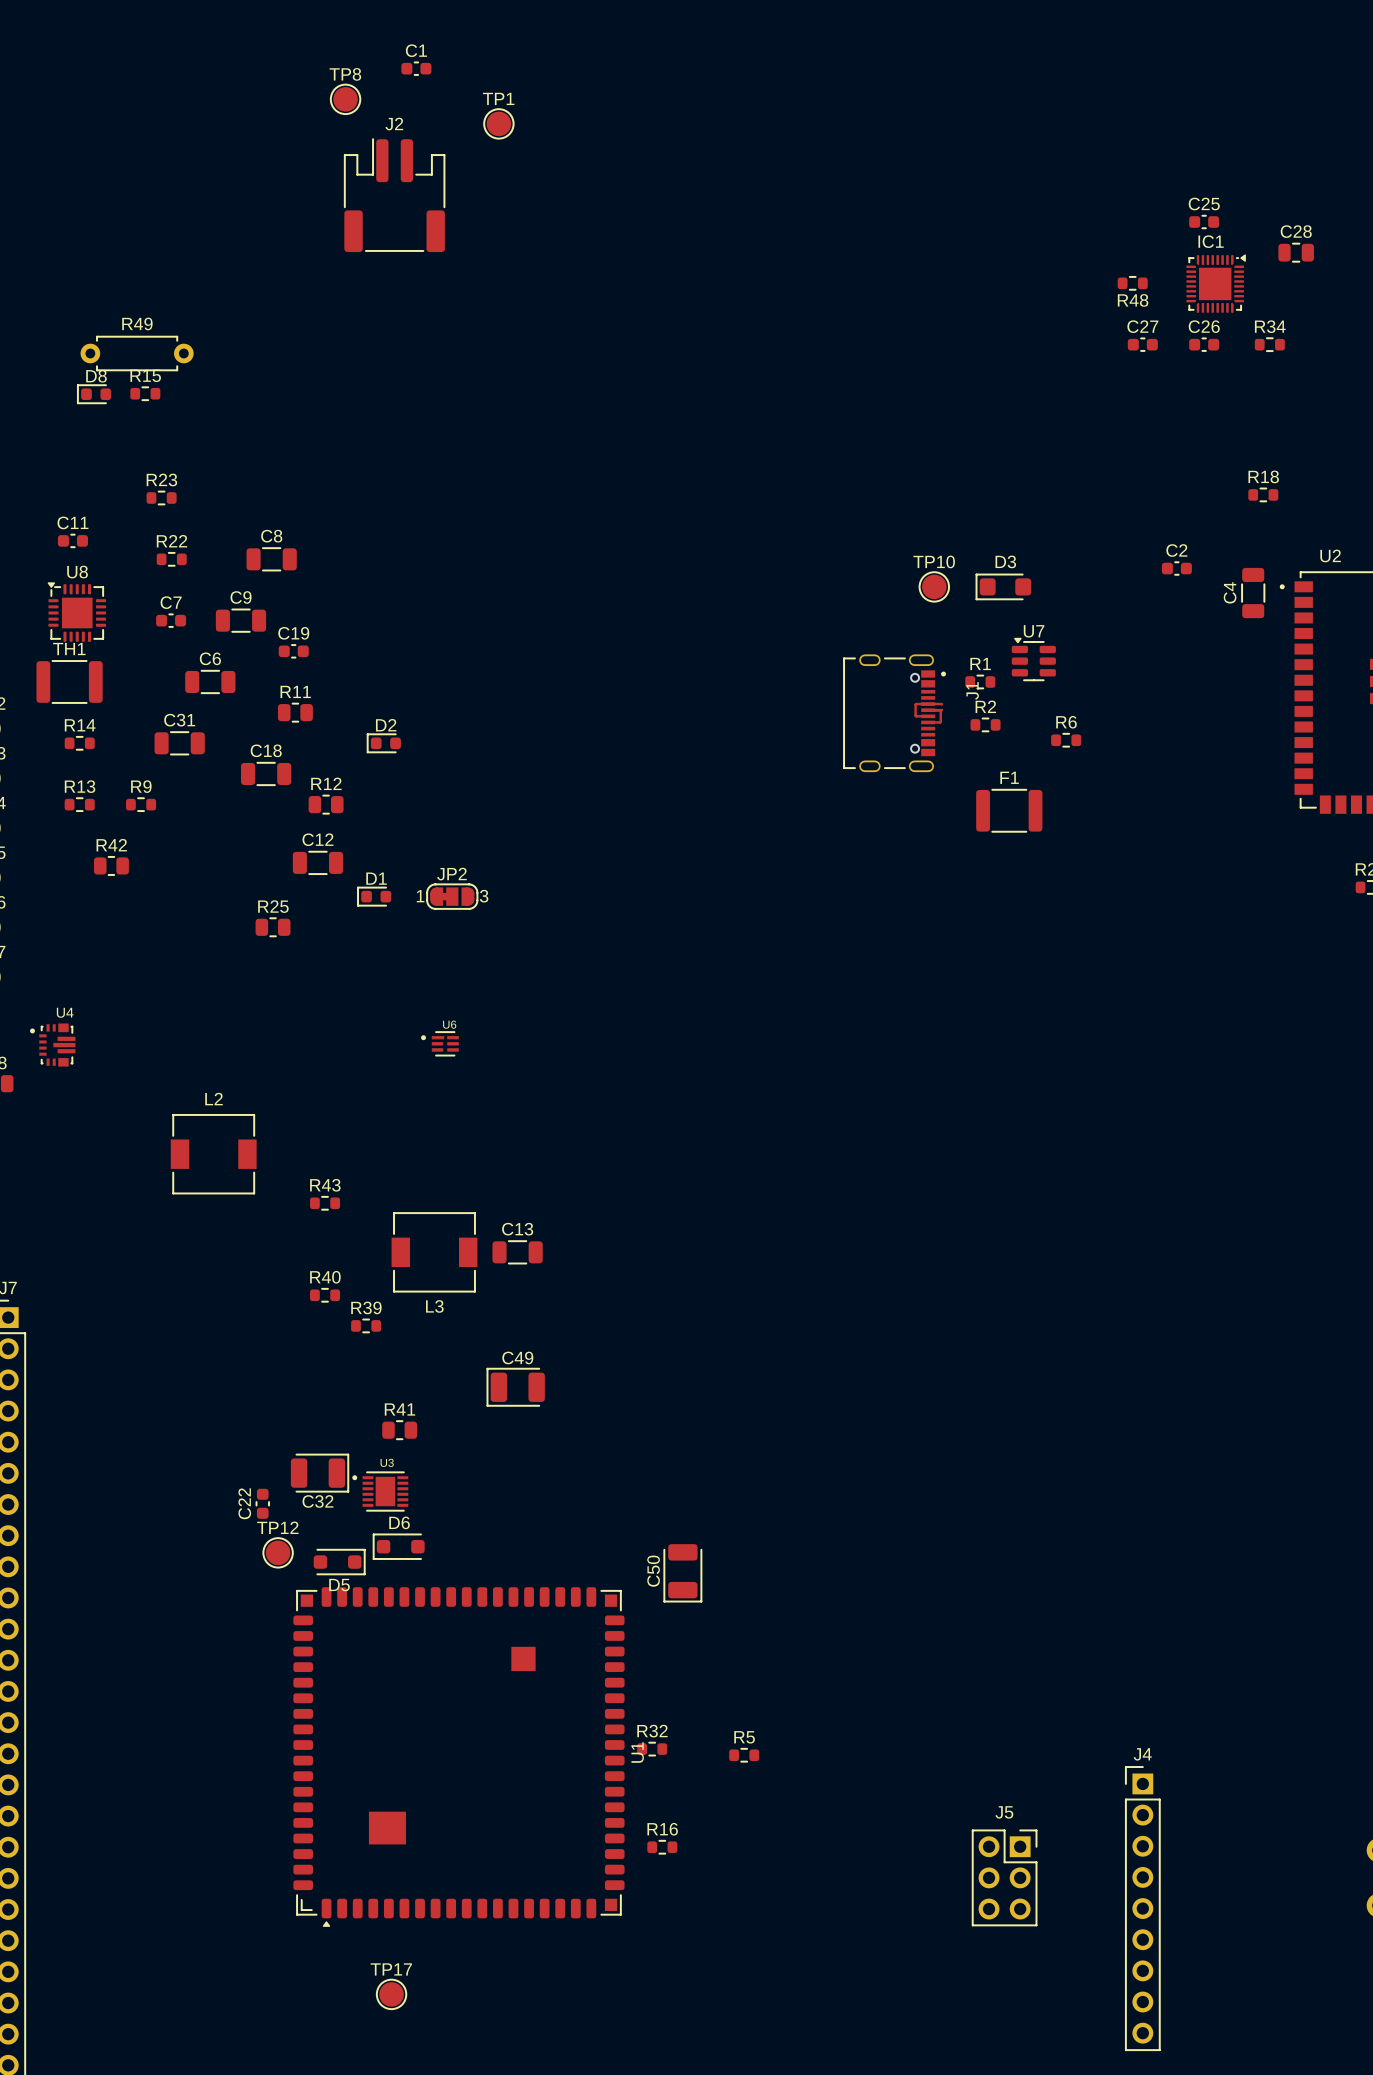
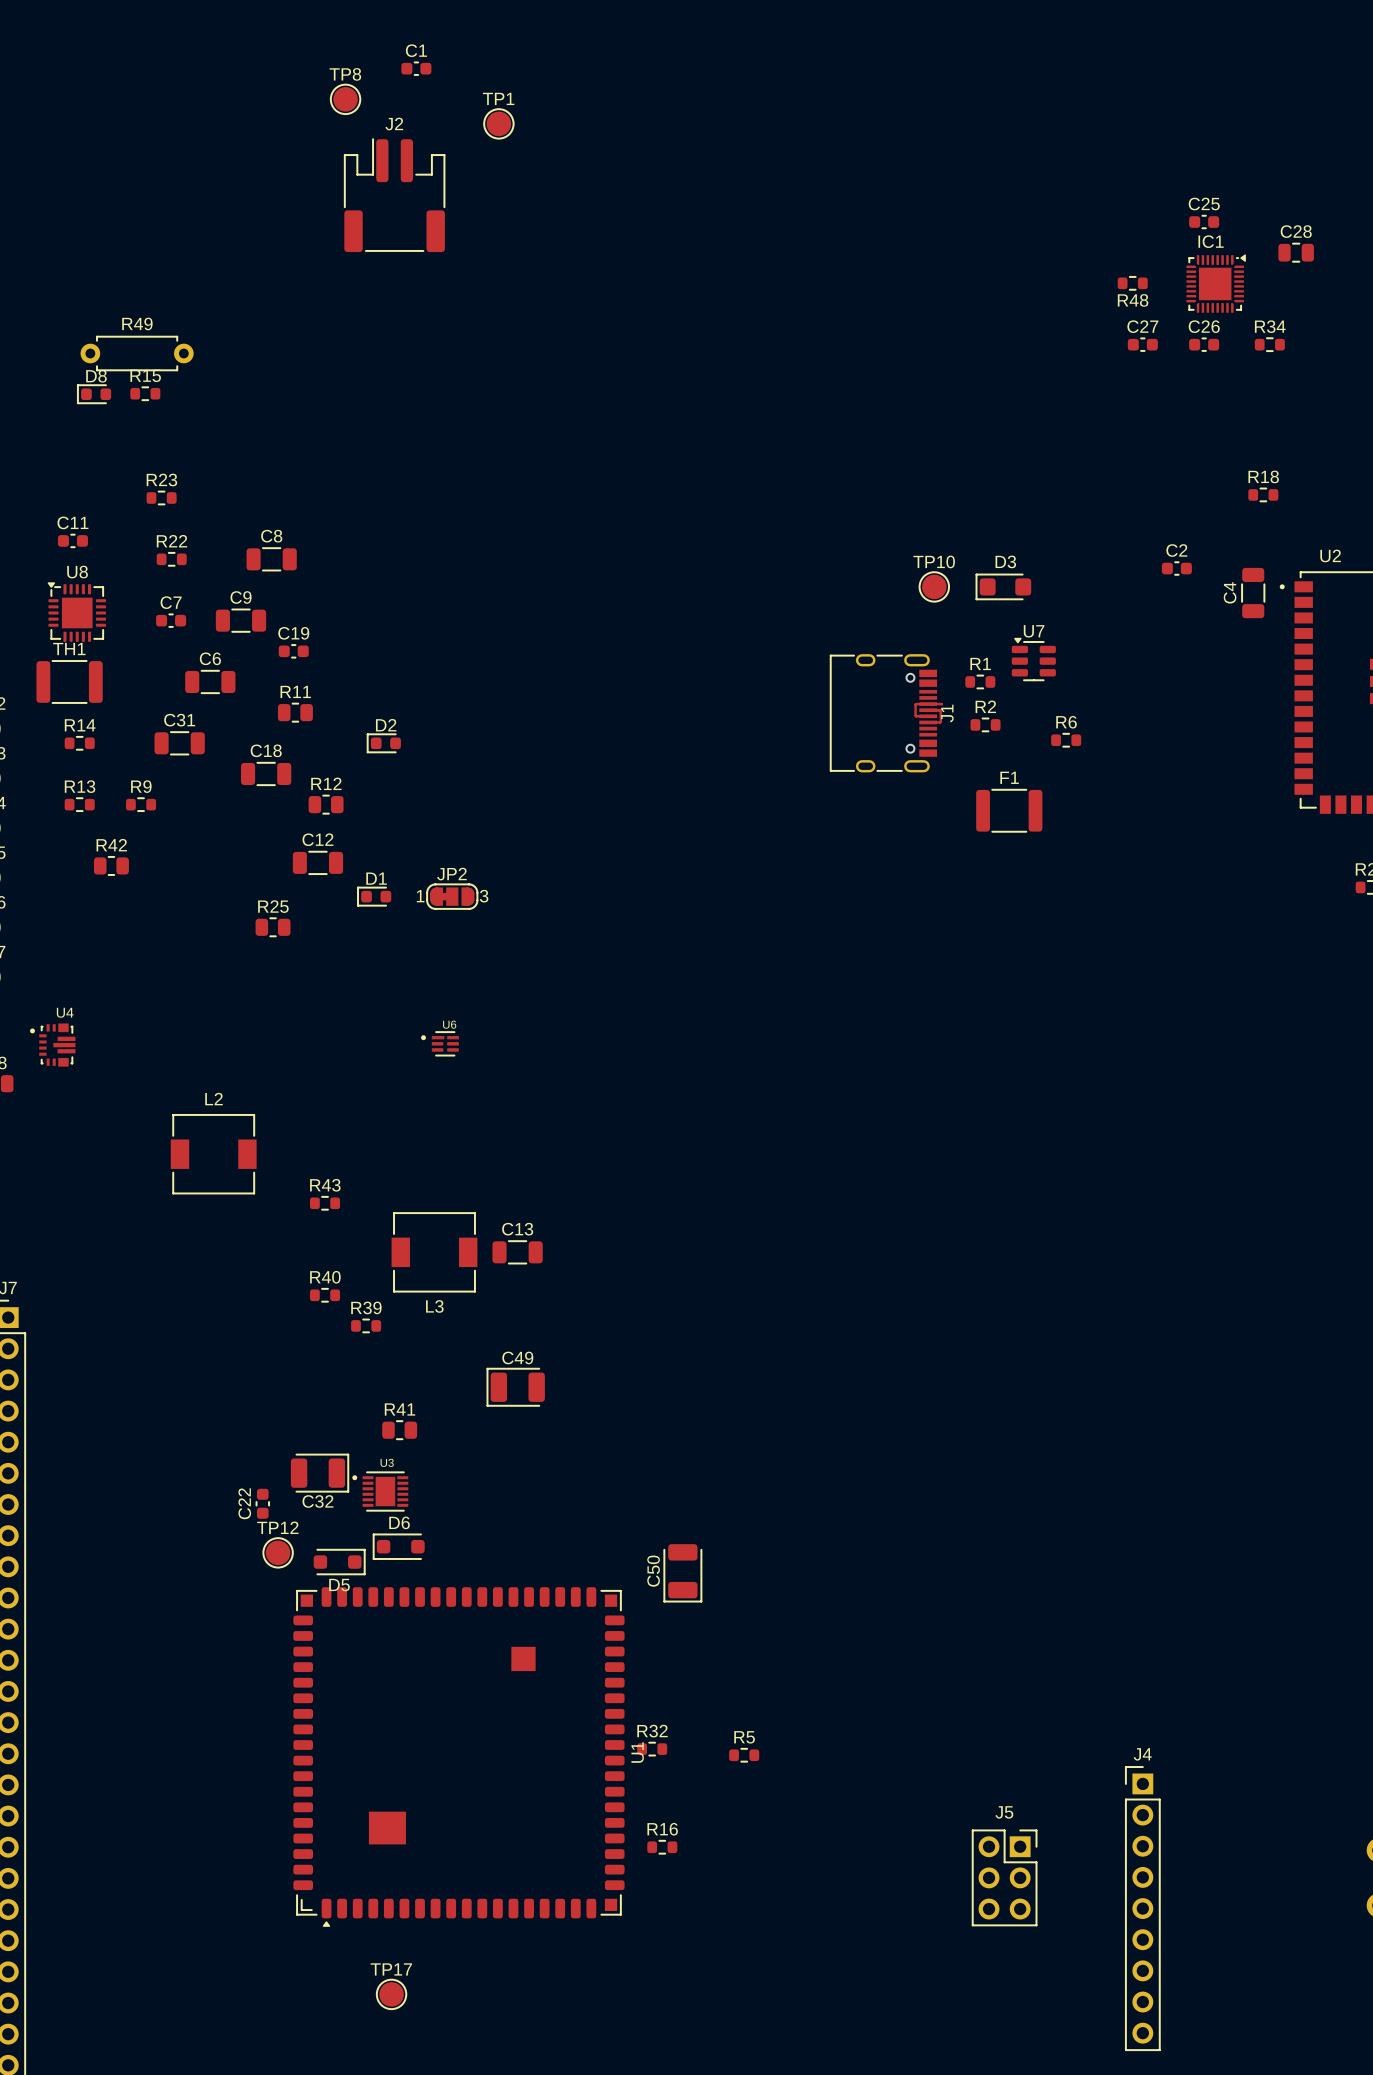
J1 footprint: [843, 654, 946, 773] -> [830, 654, 938, 773]
J1 name position: J1 (972, 690) -> J1 (947, 713)

